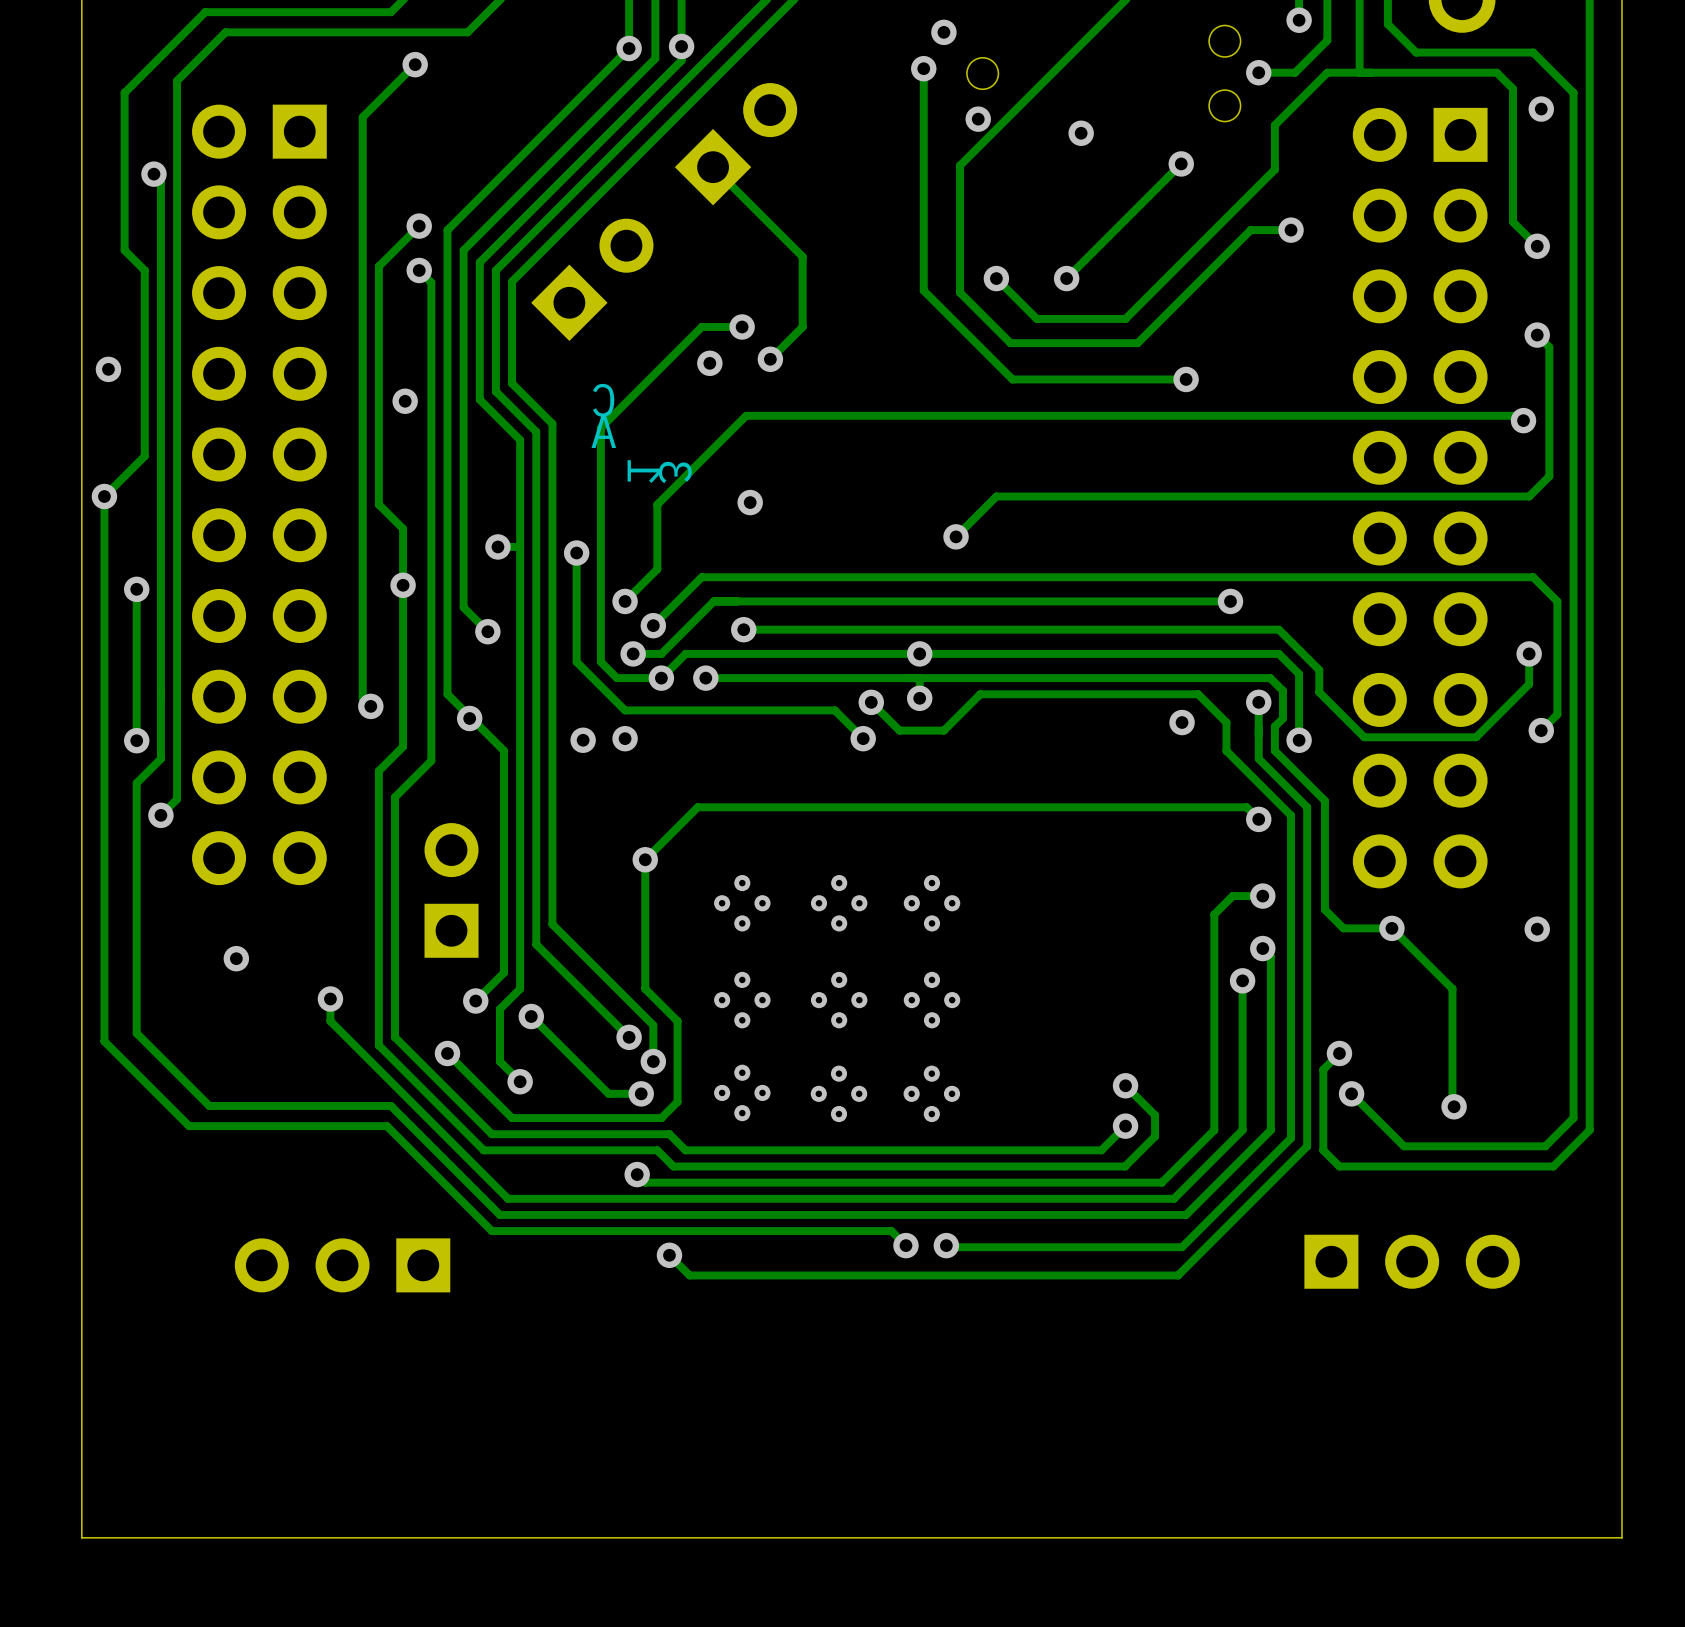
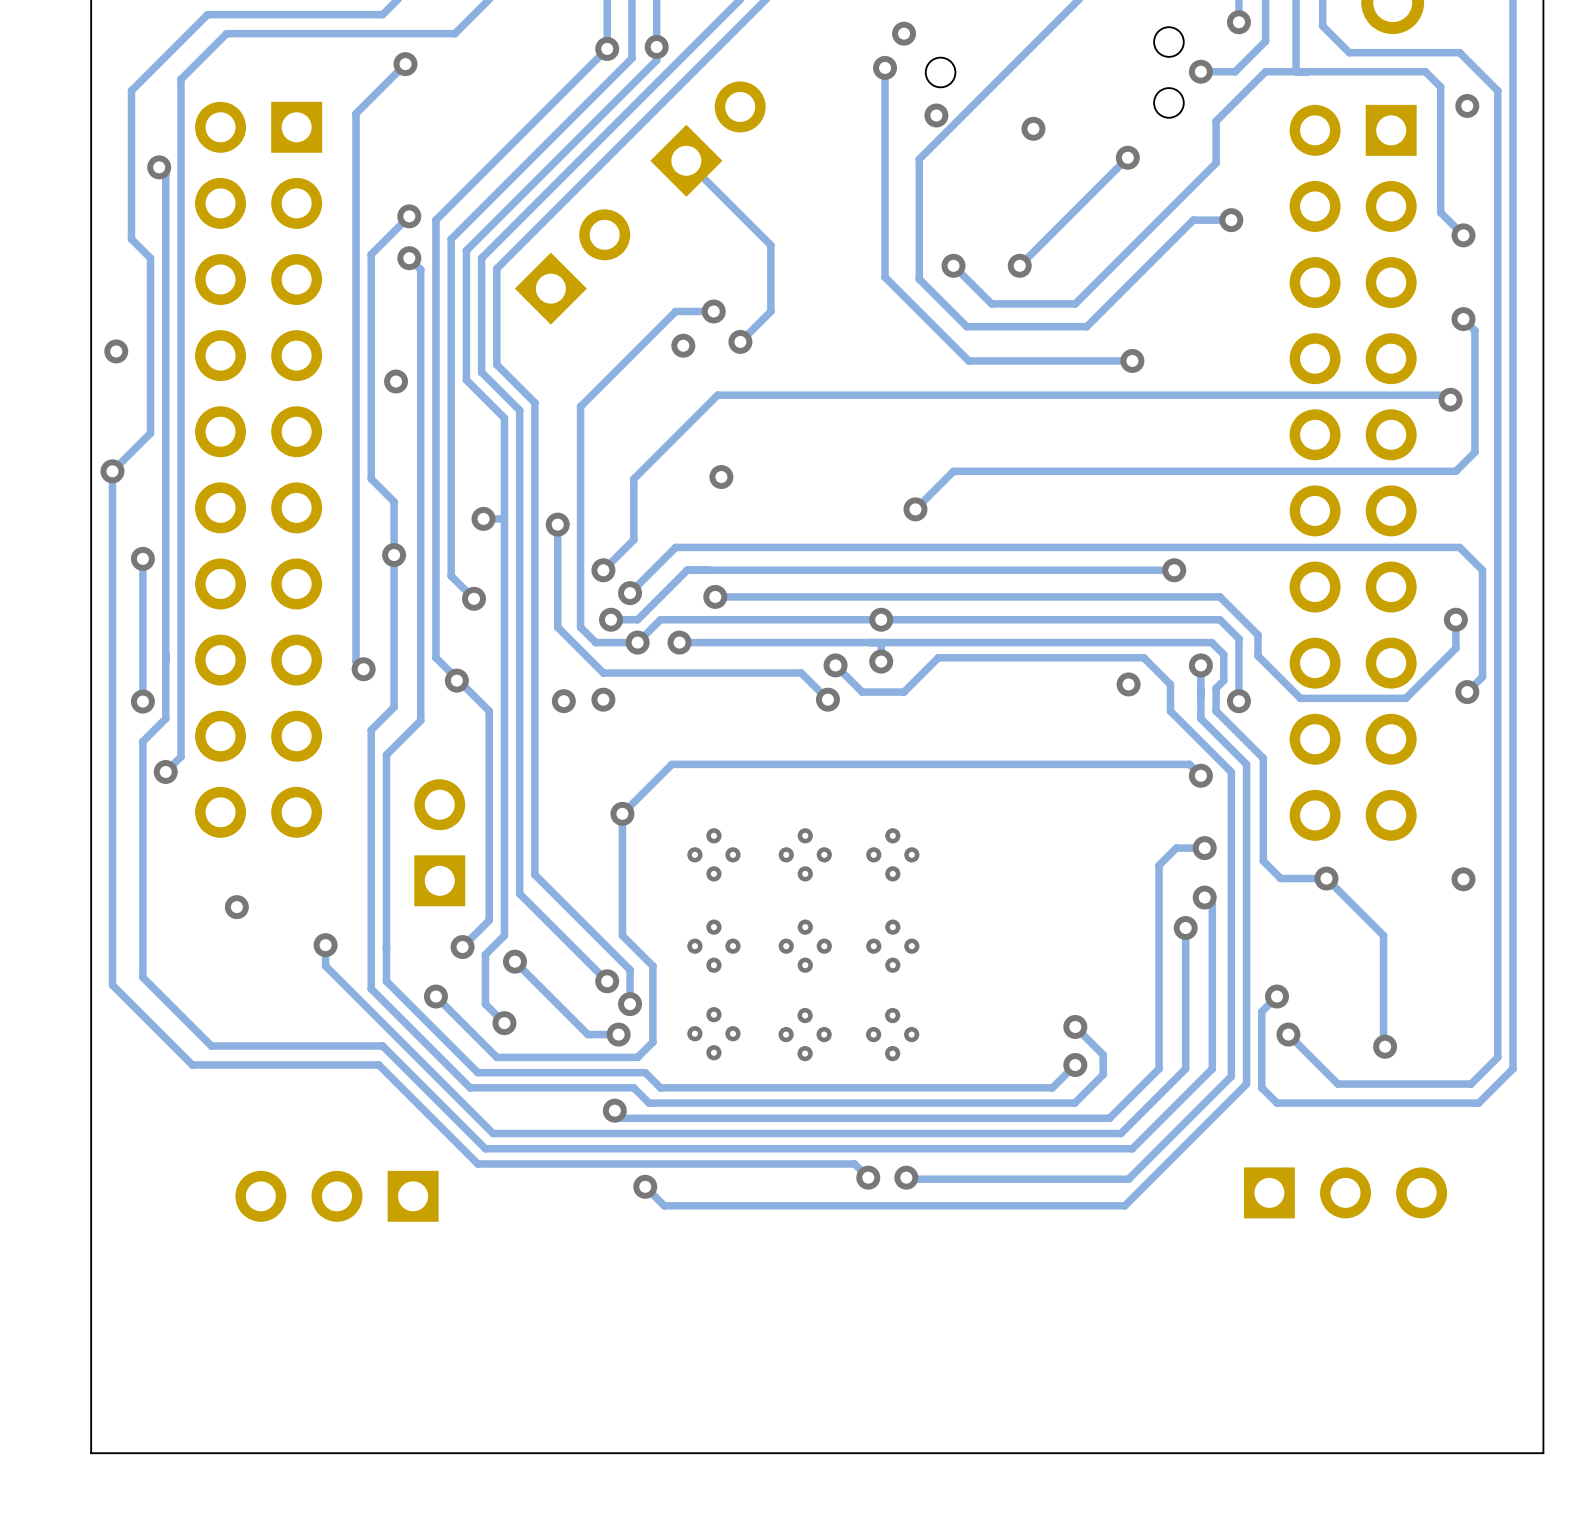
part: (641, 433) -> none

